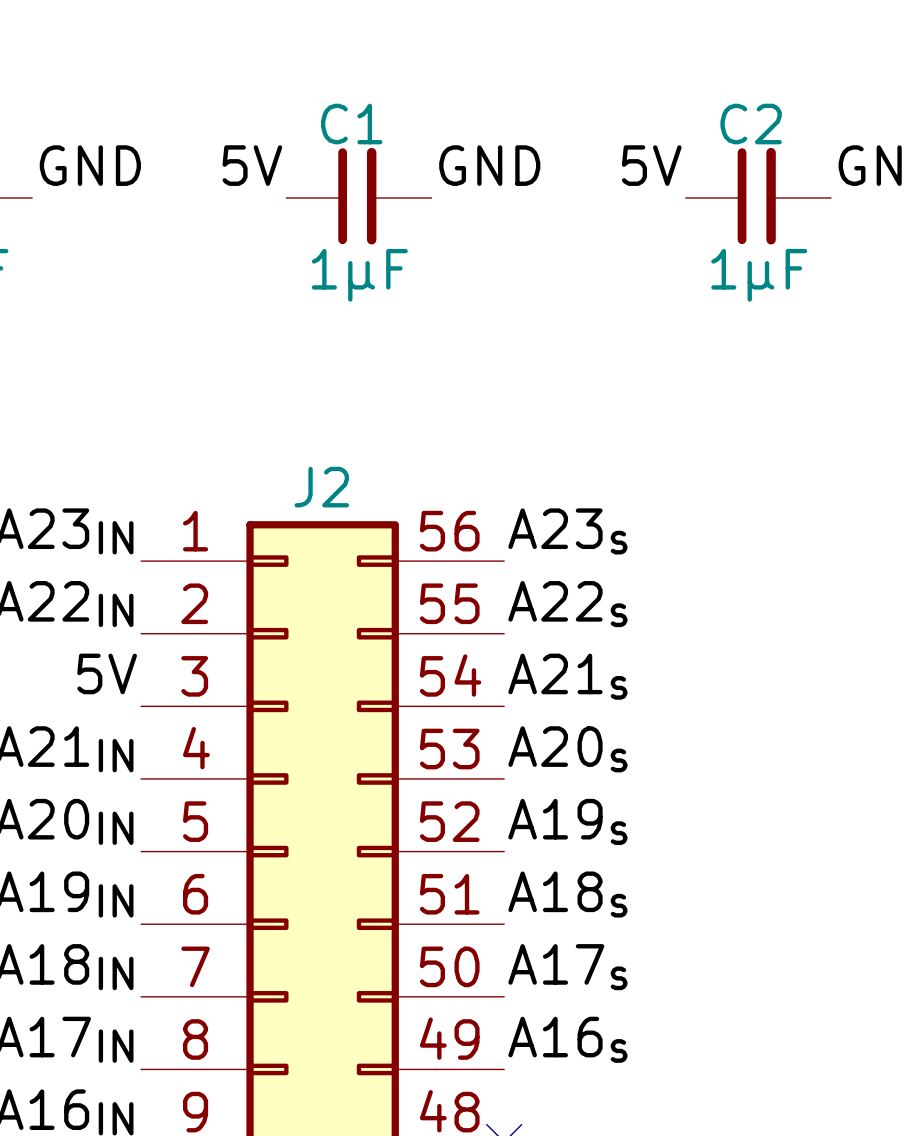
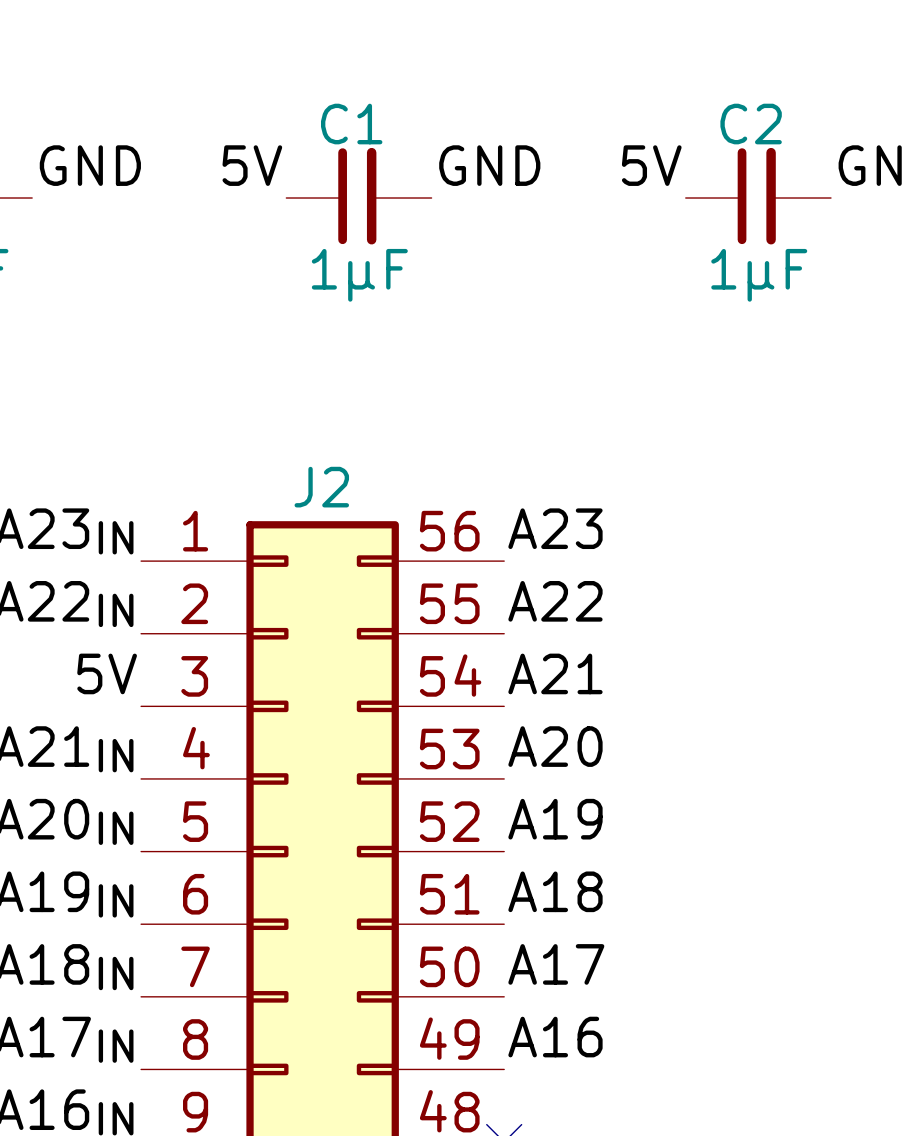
label: A23s (567, 531) -> A23 (555, 528)
label: A22s (567, 604) -> A22 (555, 601)
label: A21s (567, 676) -> A21 (555, 673)
label: A20s (567, 749) -> A20 (555, 746)
label: A19s (567, 821) -> A19 (555, 819)
label: A18s (567, 894) -> A18 (555, 891)
label: A17s (567, 967) -> A17 (556, 964)
label: A16s (567, 1039) -> A16 (555, 1037)

